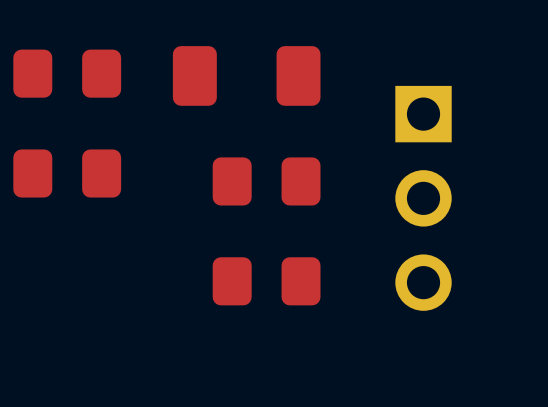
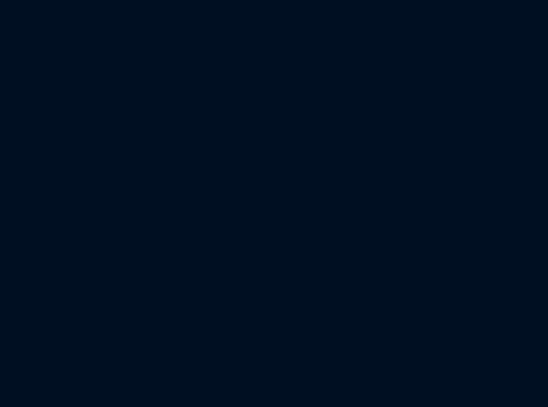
part: (67, 73) -> none
part: (246, 75) -> none
part: (67, 173) -> none
part: (266, 181) -> none
part: (423, 198) -> none
part: (266, 281) -> none

